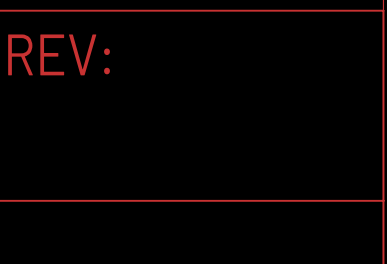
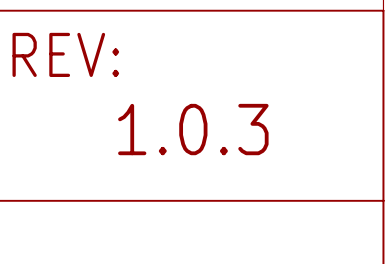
text: none -> 1.0.3 (193, 129)

